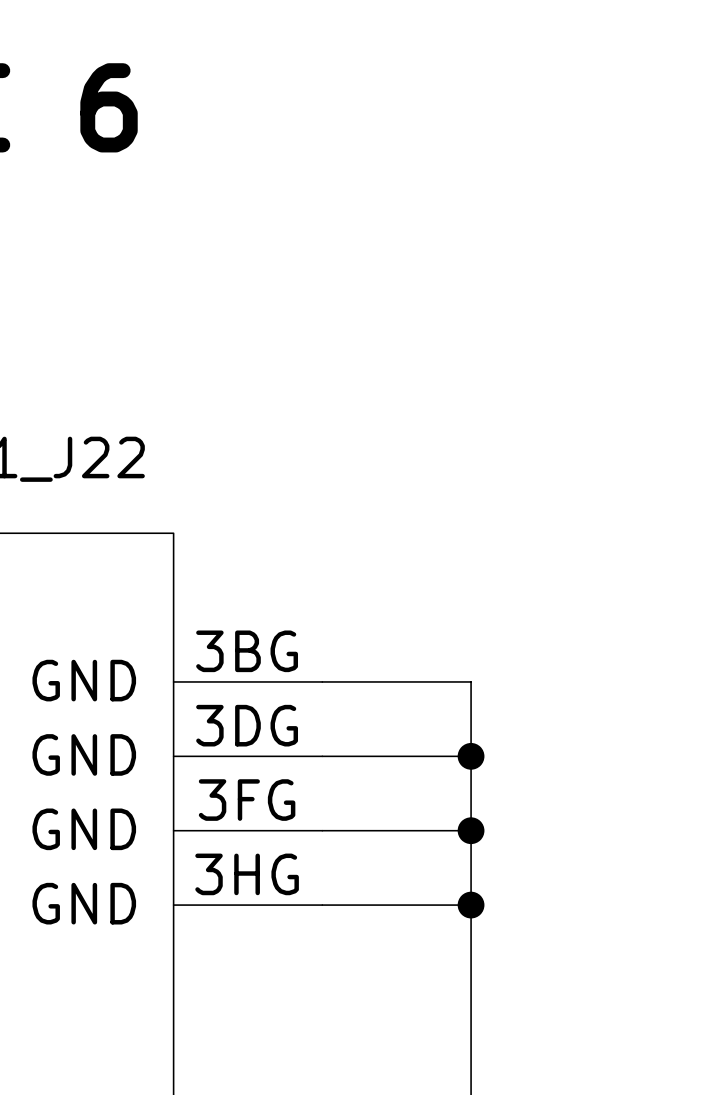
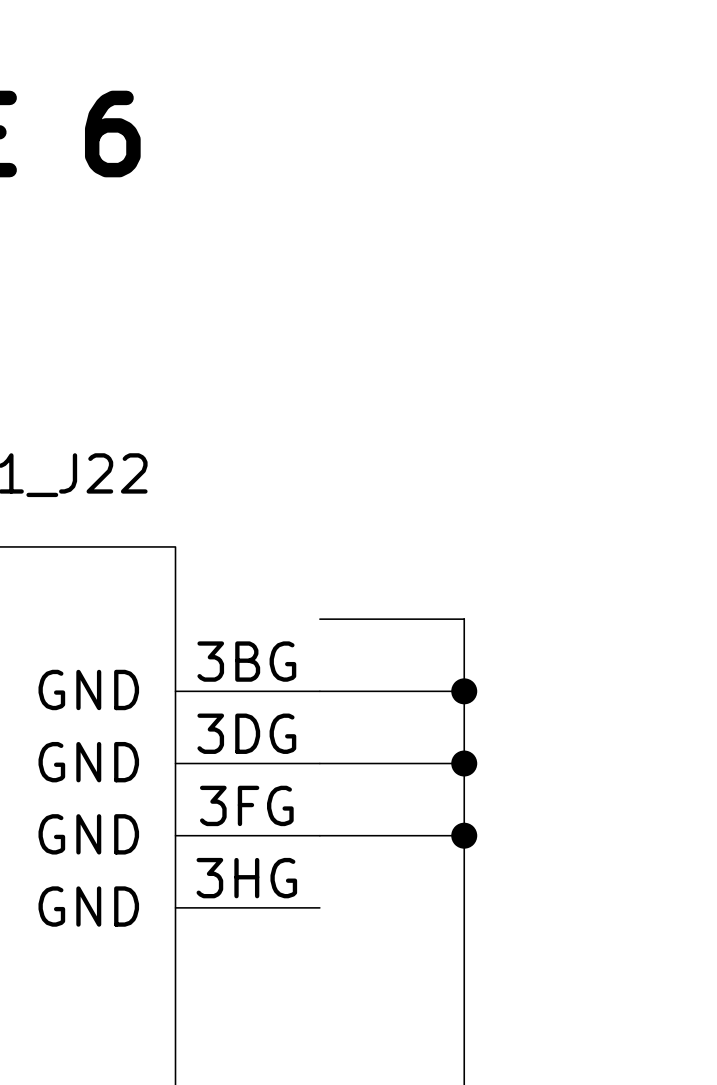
wire: none -> (319, 619) (464, 619) (464, 691)
junction: none -> (464, 691)
wire: (322, 905) (471, 905) -> none
junction: (471, 905) -> none

